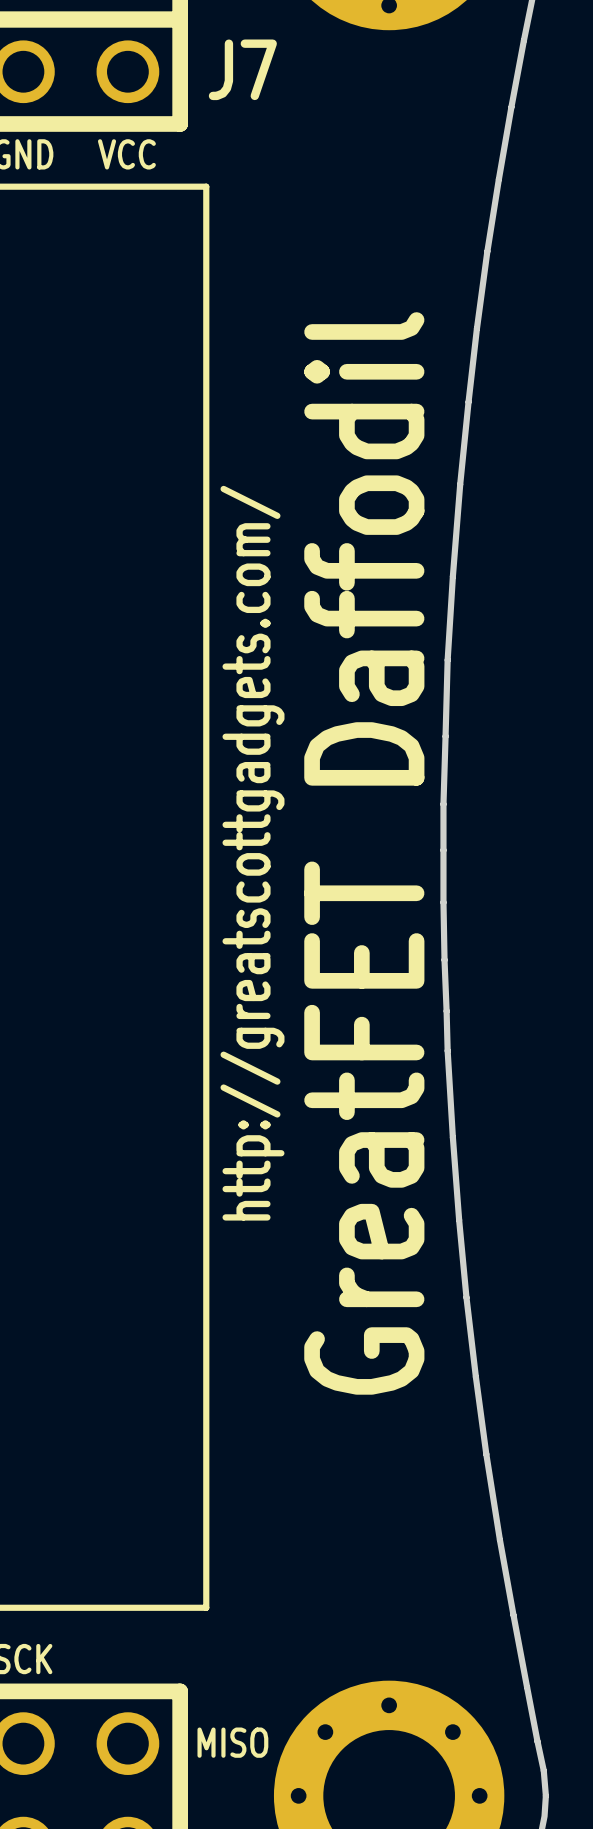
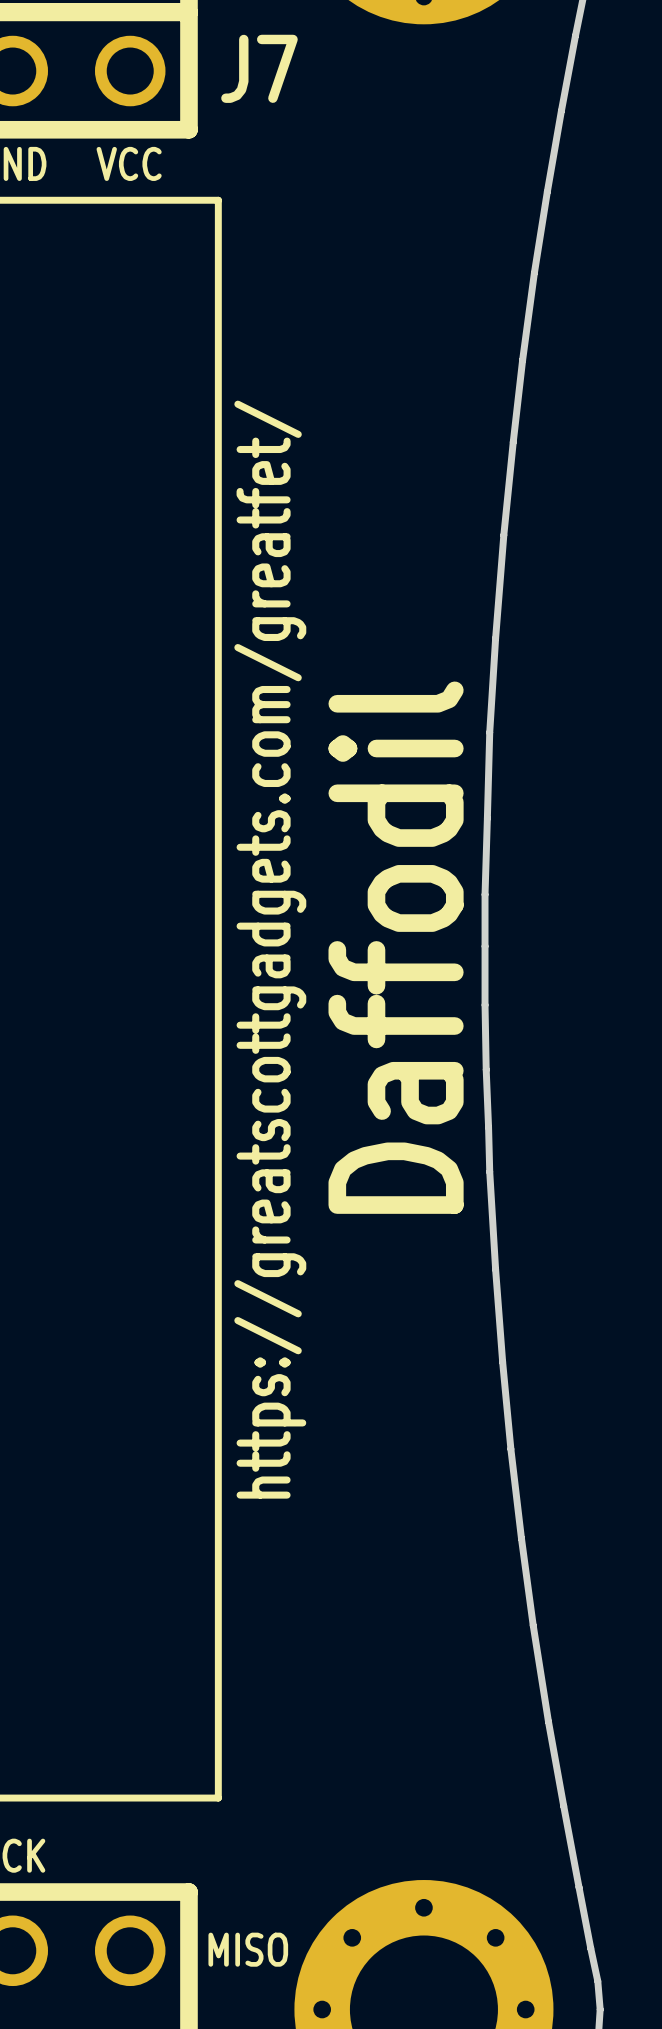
text: http://greatscottgadgets.com/ (252, 853) -> https://greatscottgadgets.com/greatfet/ (270, 949)
text: GreatFET Daffodil (364, 853) -> Daffodil (396, 947)

